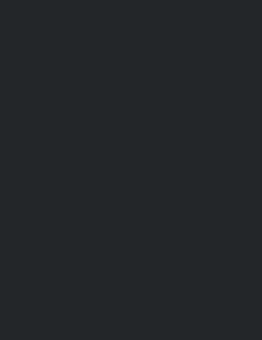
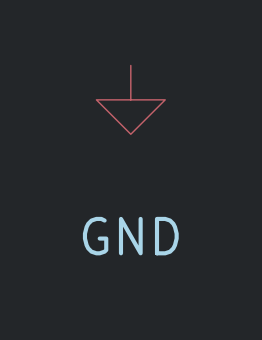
power symbol: none -> GND (130, 99)

